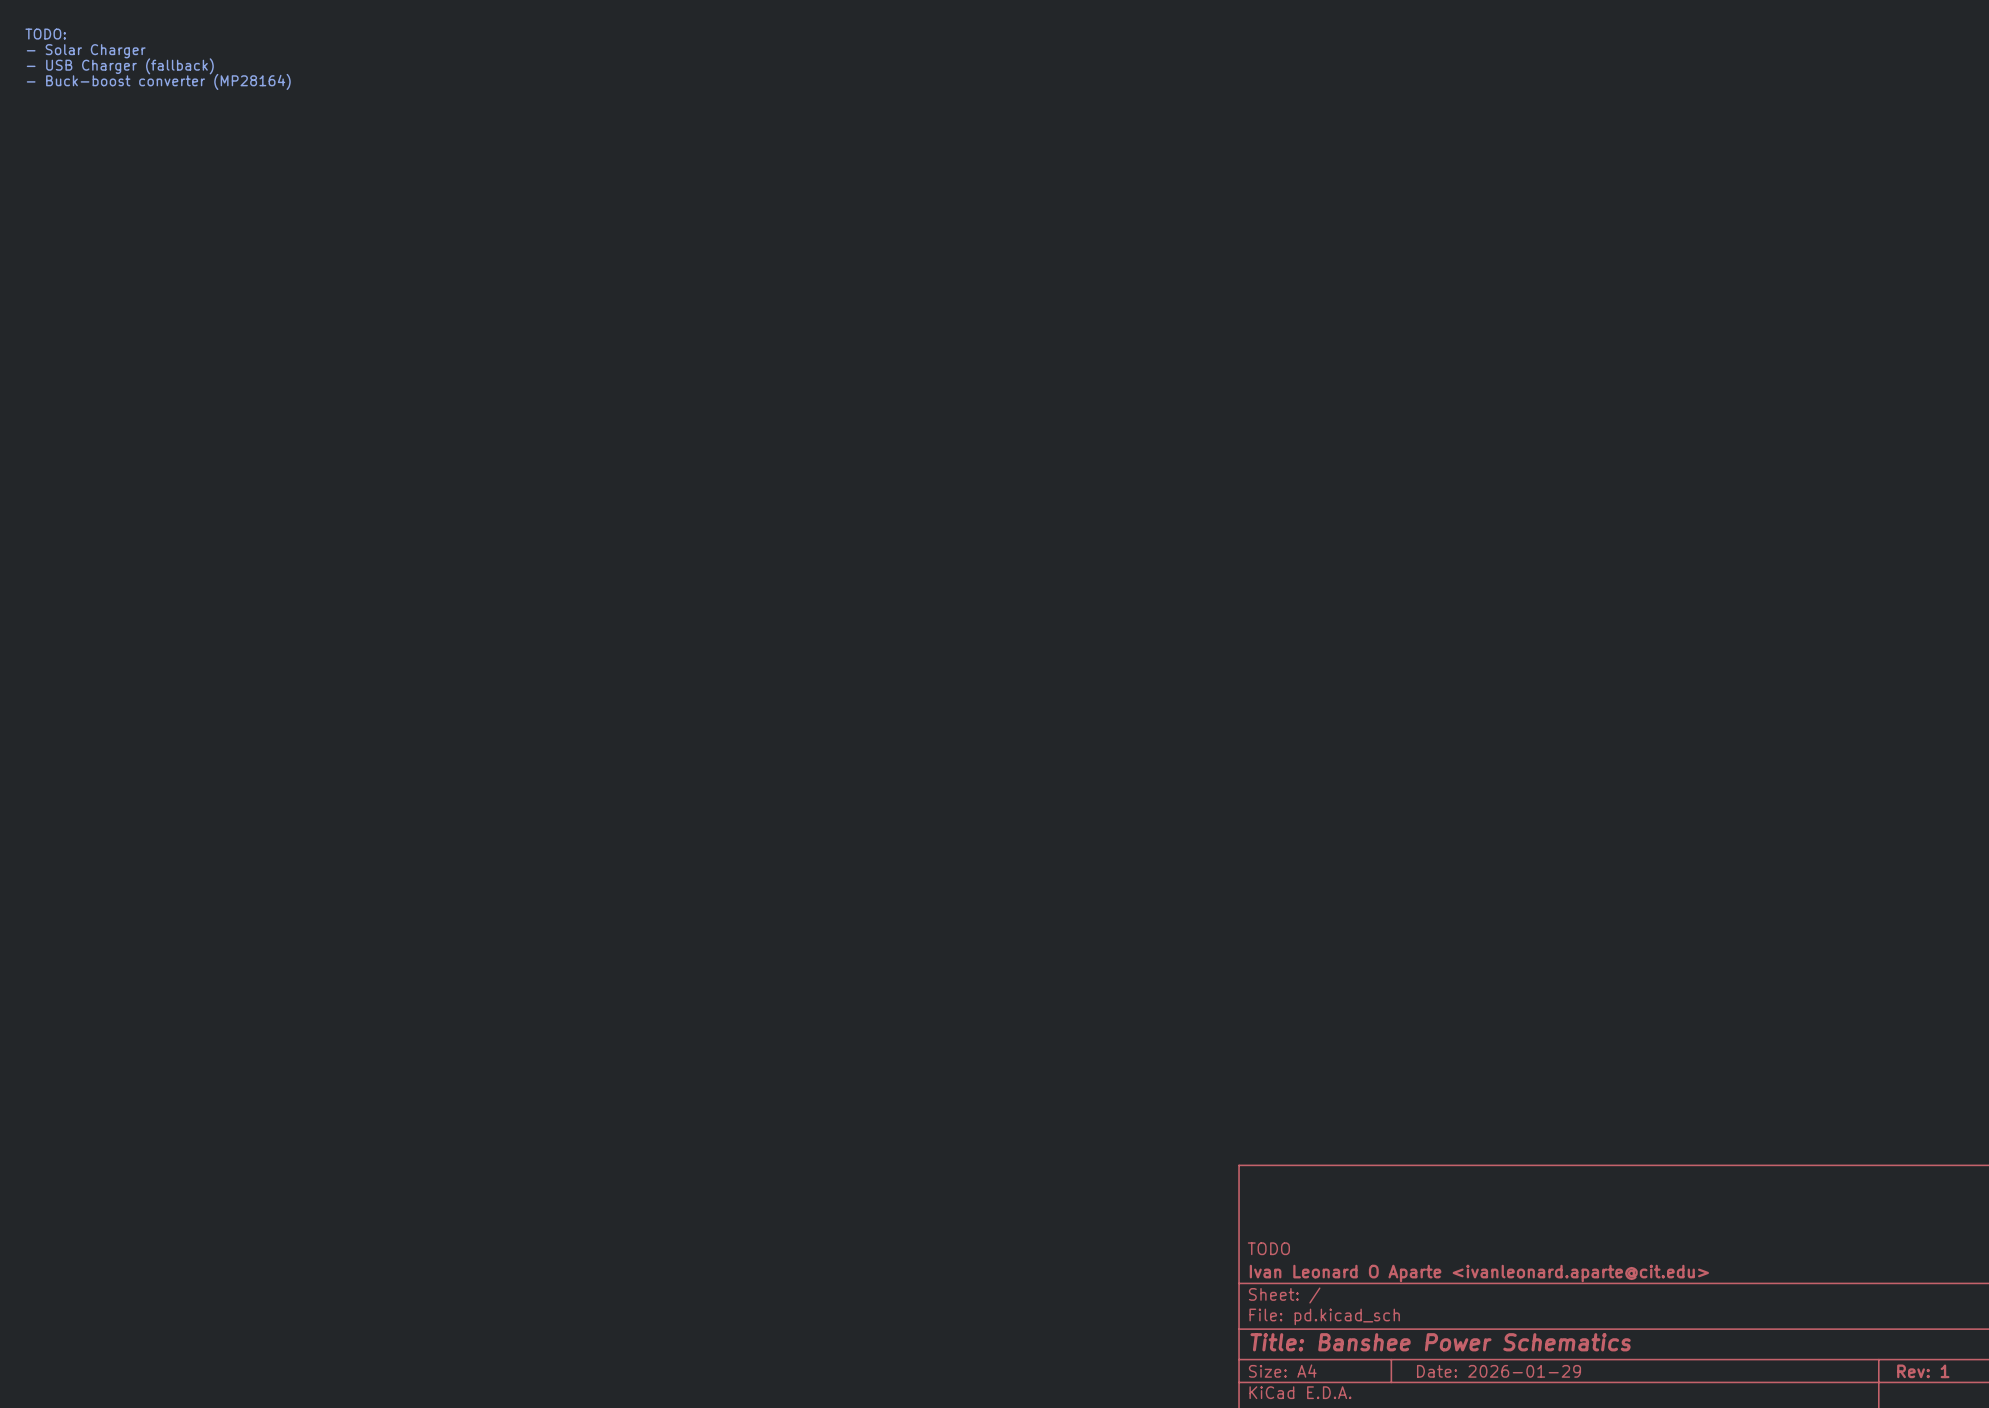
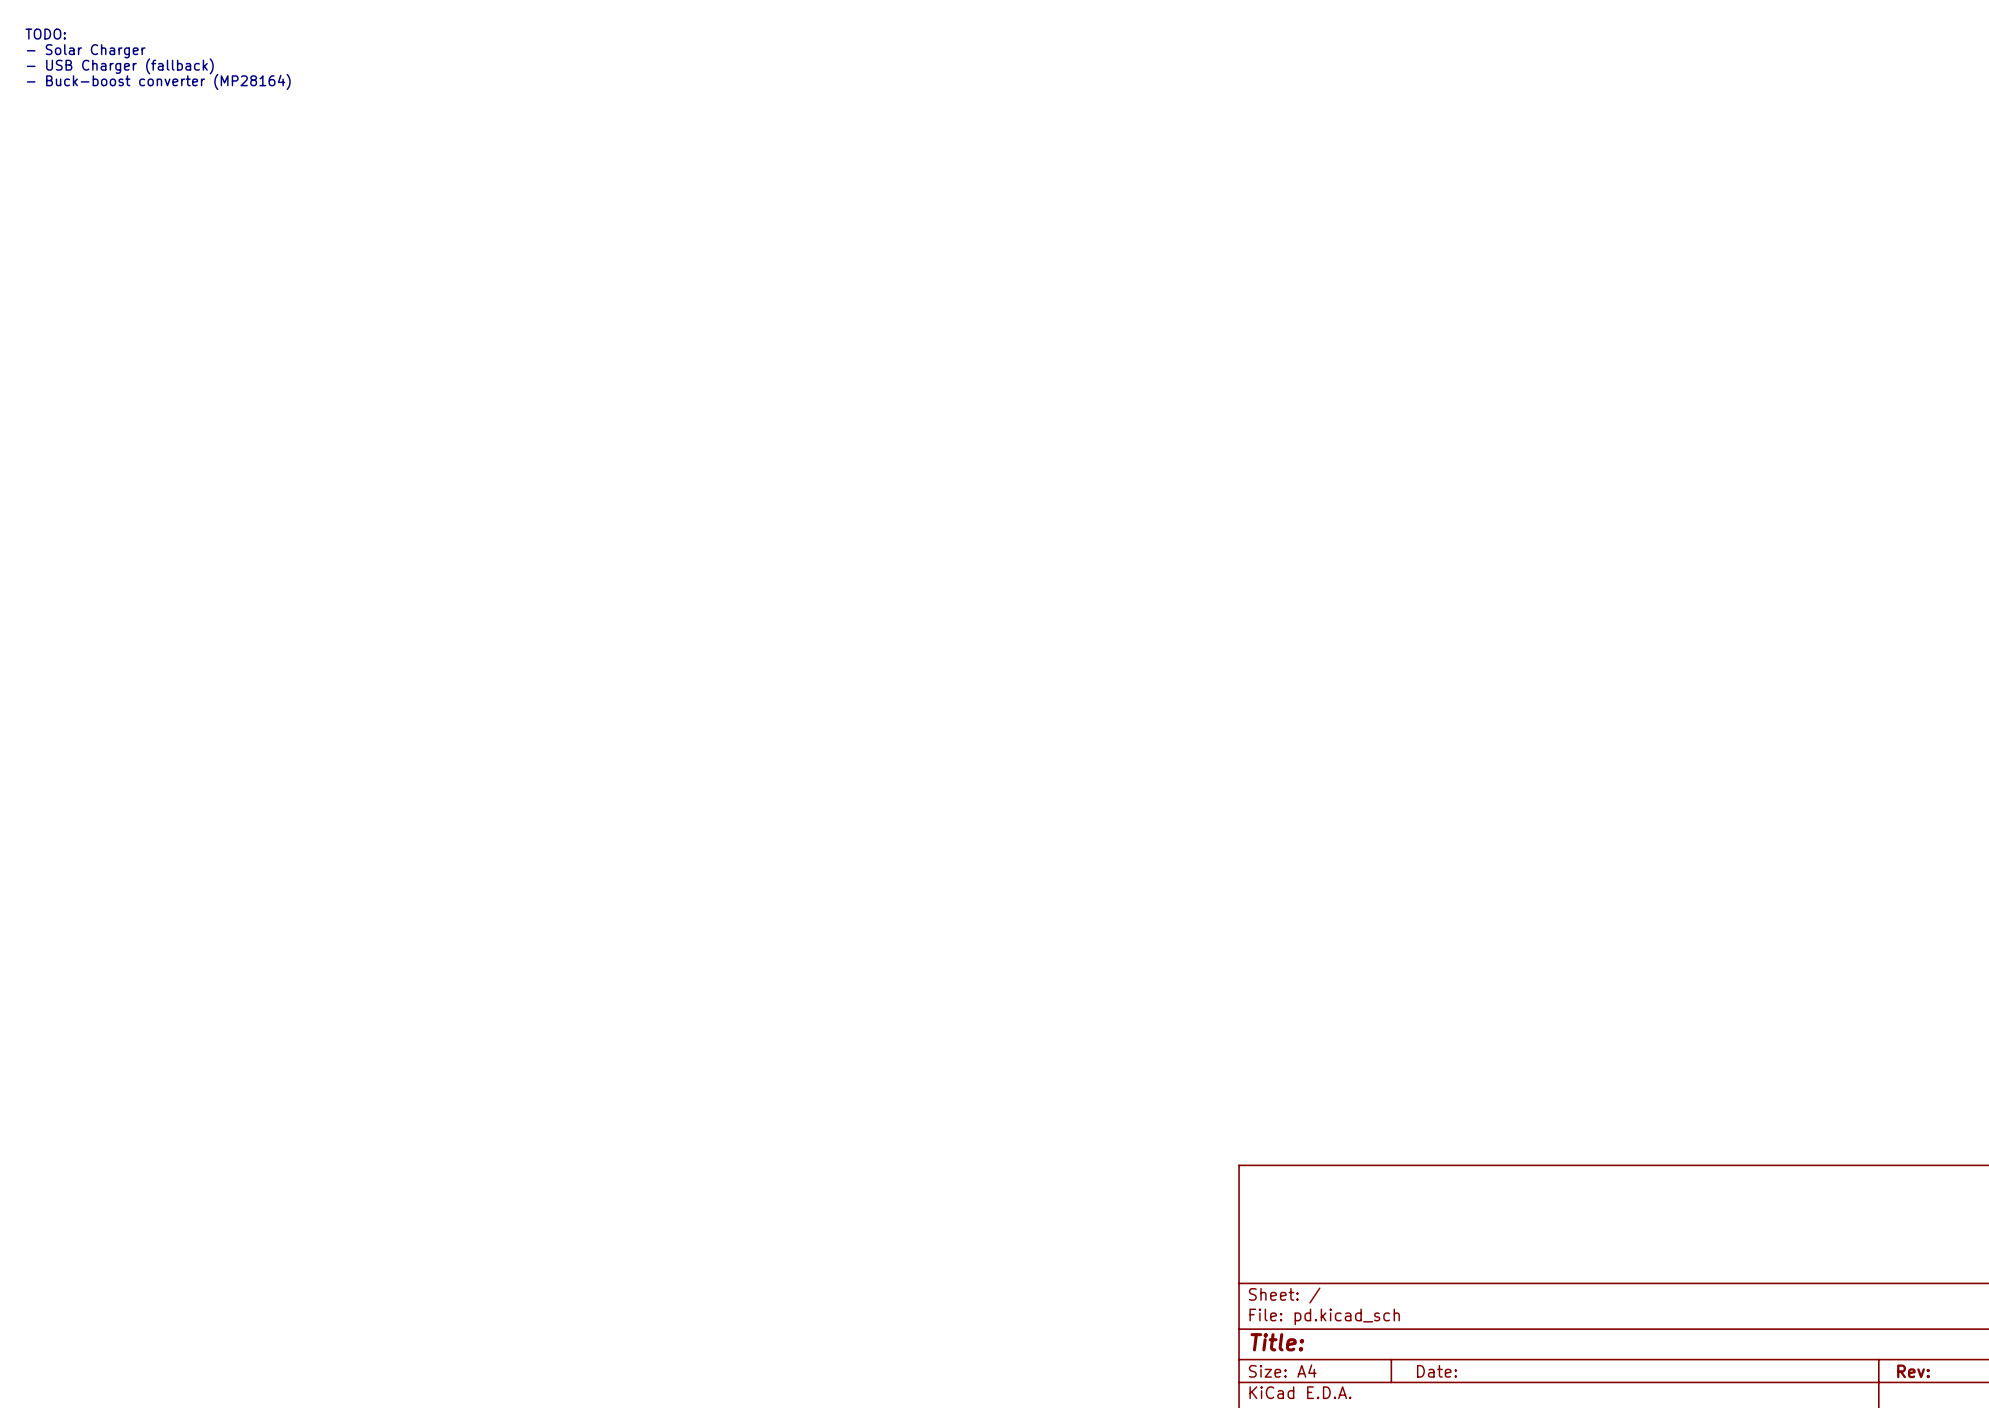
title block: TODO (1268, 1248) -> none
title block: Ivan Leonard O Aparte <ivanleonard.aparte@cit.edu> (1479, 1273) -> none
title block: Title: Banshee Power Schematics (1440, 1342) -> Title: (1277, 1342)
title block: Date: 2026-01-29 (1499, 1371) -> Date: (1437, 1371)
title block: Rev: 1 (1923, 1371) -> Rev: (1913, 1371)

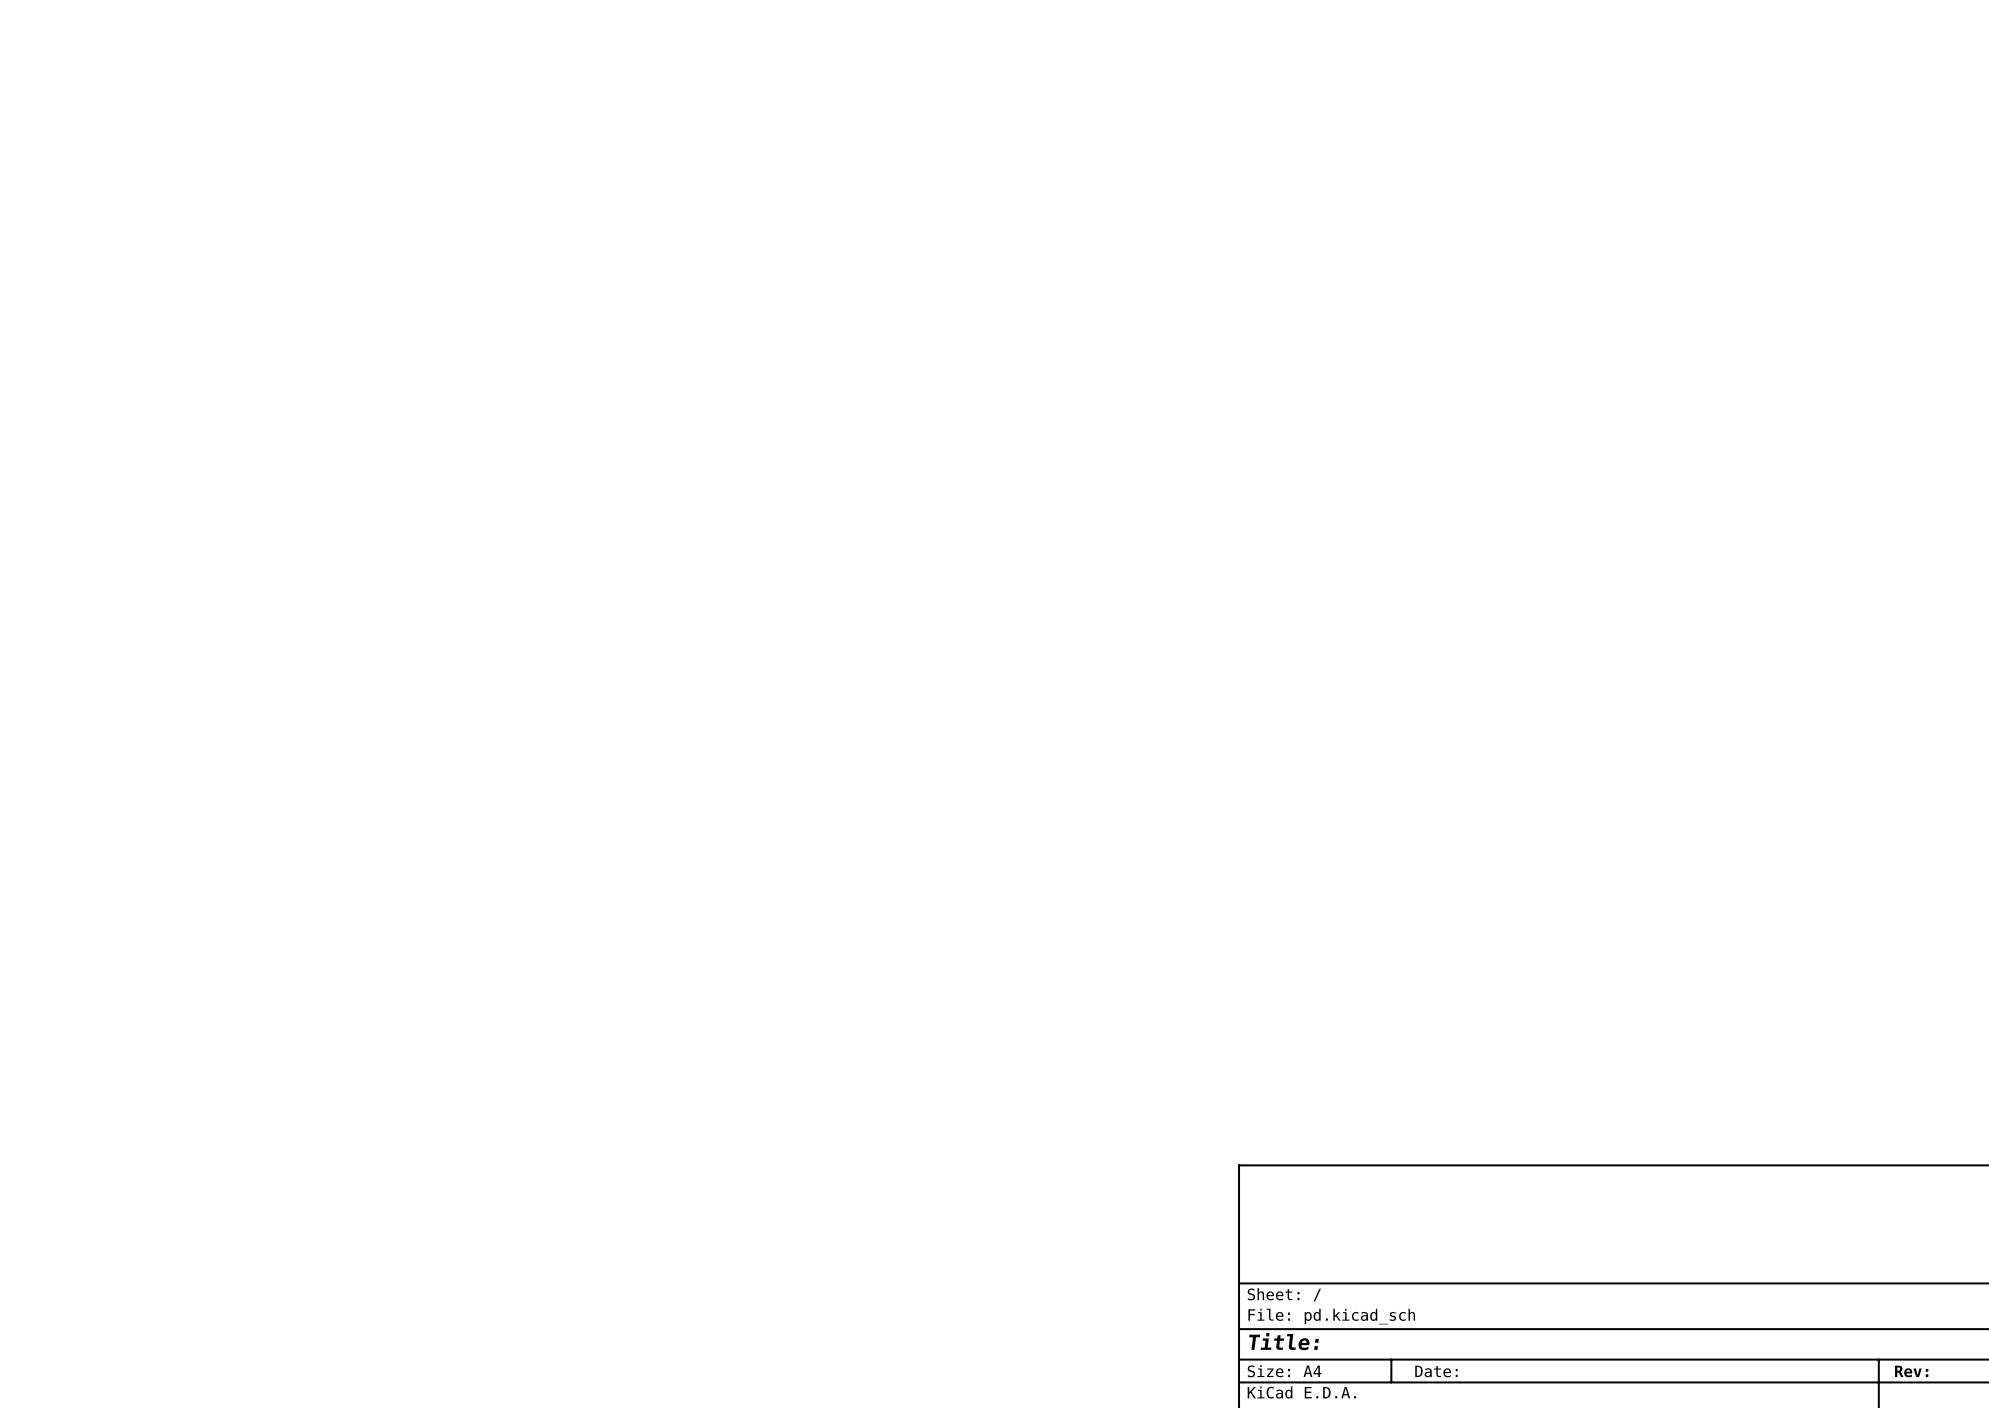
text: TODO: (45, 34) -> none
text: - Solar Charger (86, 51) -> none
text: - USB Charger (fallback) (120, 66) -> none
text: - Buck-boost converter (MP28164) (158, 81) -> none

